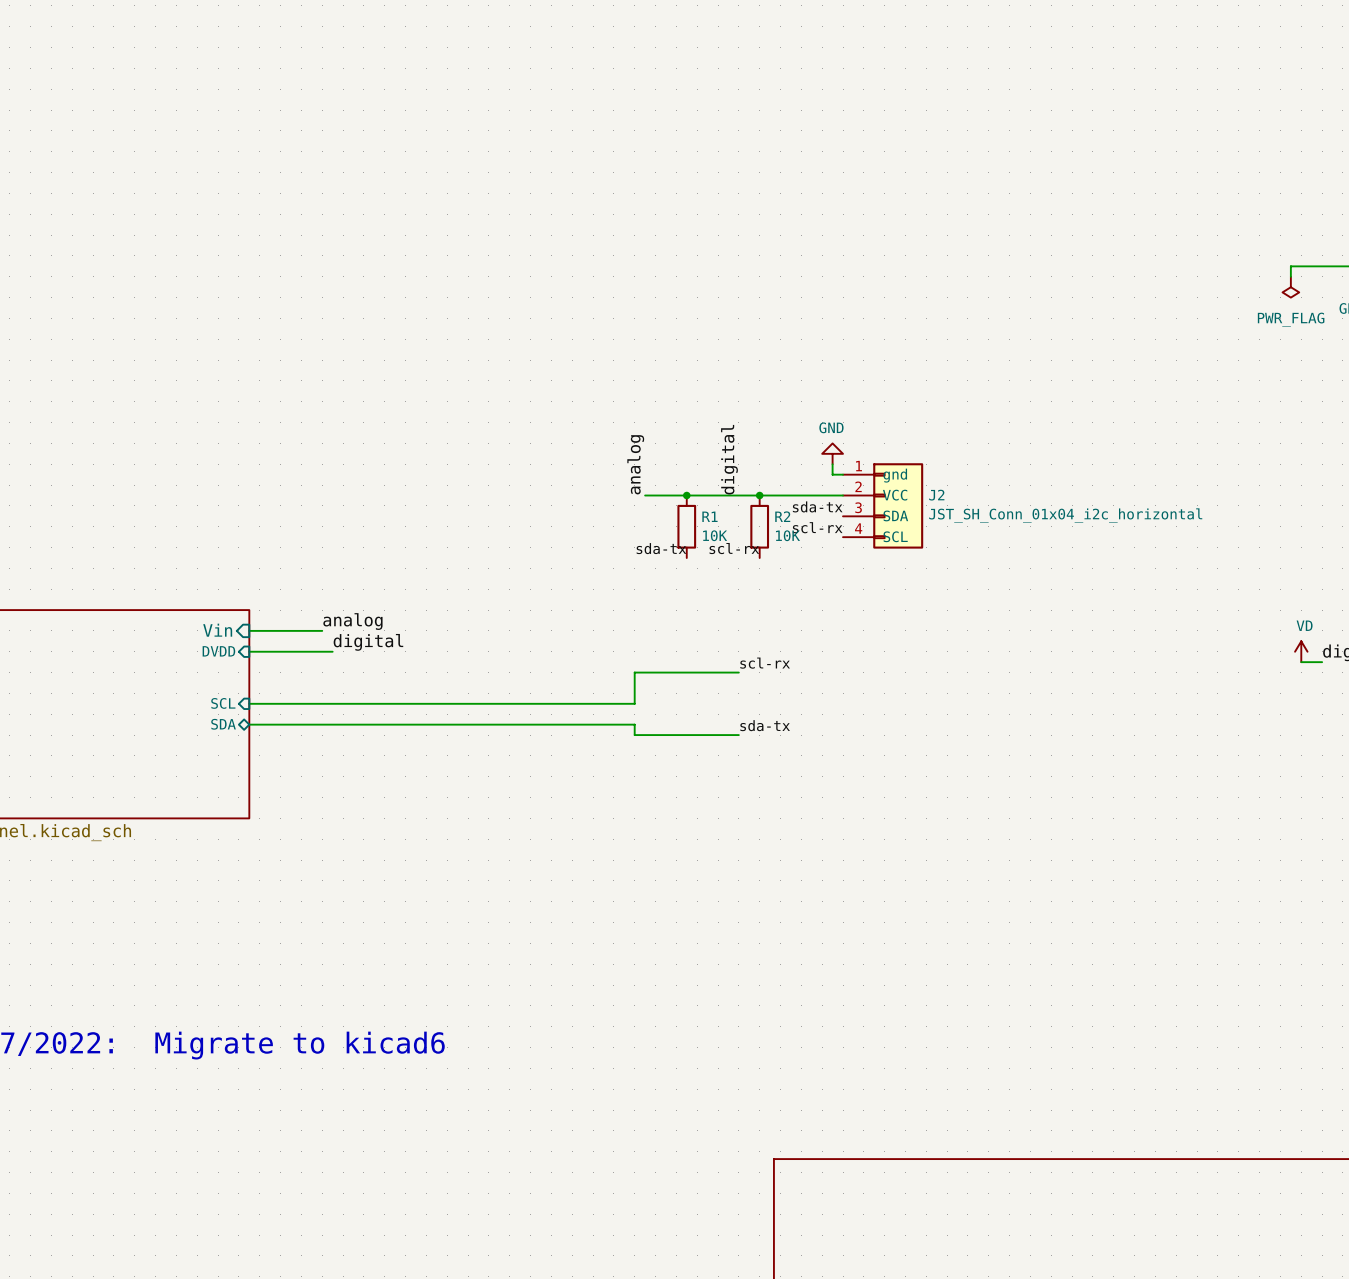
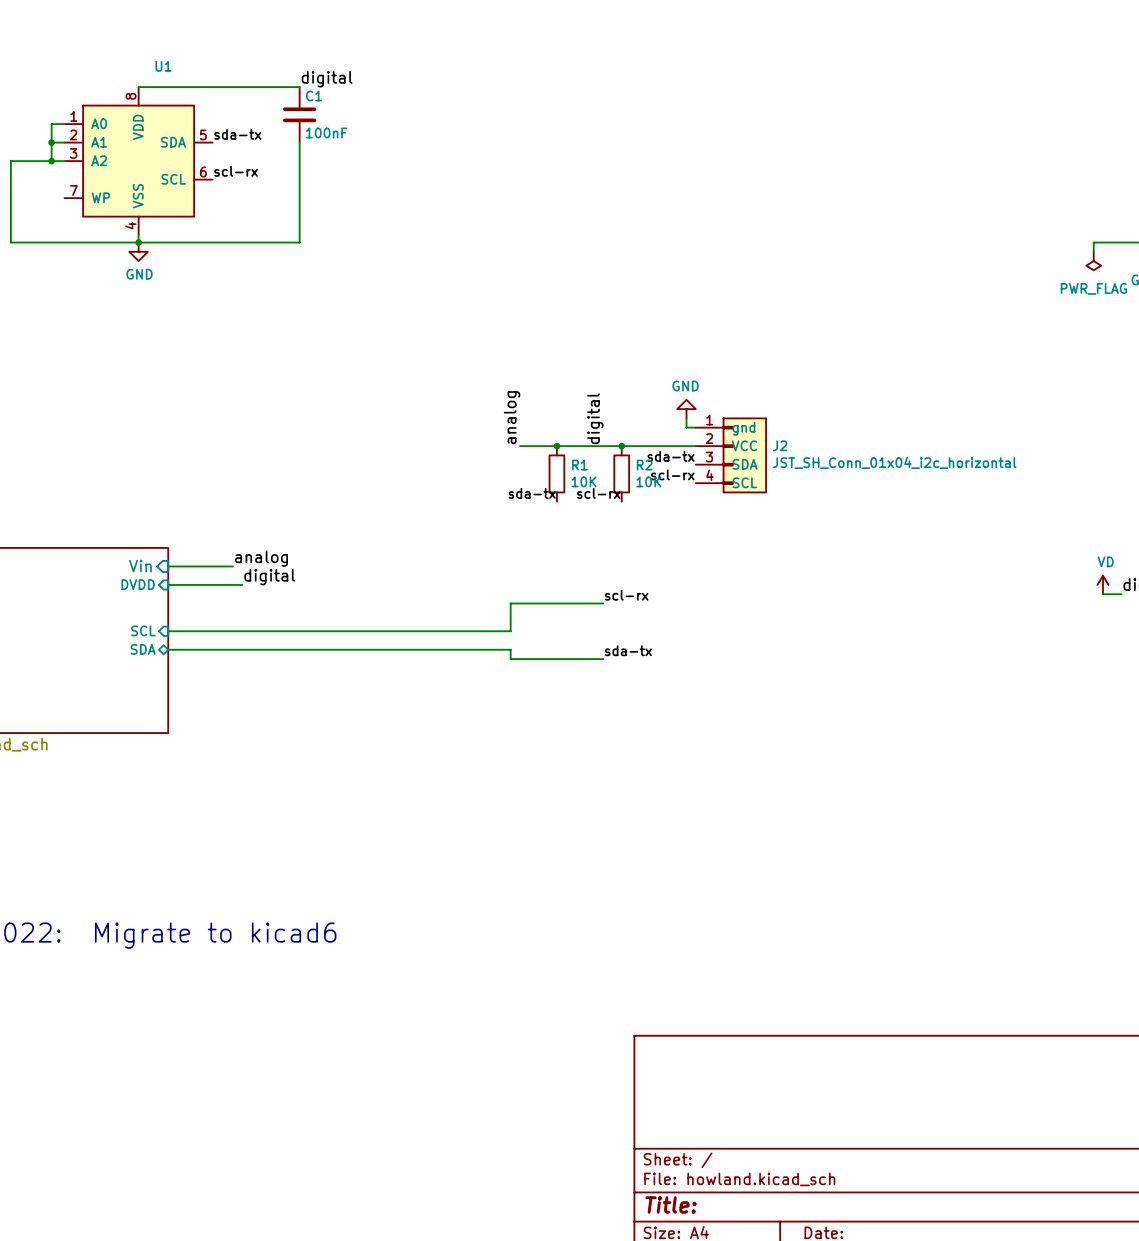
label: none -> digital (327, 79)
wire: none -> (138, 87) (299, 87)
C1: none -> 100nF (299, 114)
wire: none -> (64, 124) (51, 124) (51, 161)
label: none -> sda-tx (237, 134)
wire: none -> (51, 142) (64, 142)
junction: none -> (51, 142)
wire: none -> (299, 142) (299, 242) (140, 242)
junction: none -> (51, 161)
wire: none -> (64, 161) (10, 161) (10, 242) (138, 242) (138, 235)
U1: none -> (138, 161)
label: none -> scl-rx (236, 171)
junction: none -> (138, 242)
power symbol: none -> GND (138, 251)

